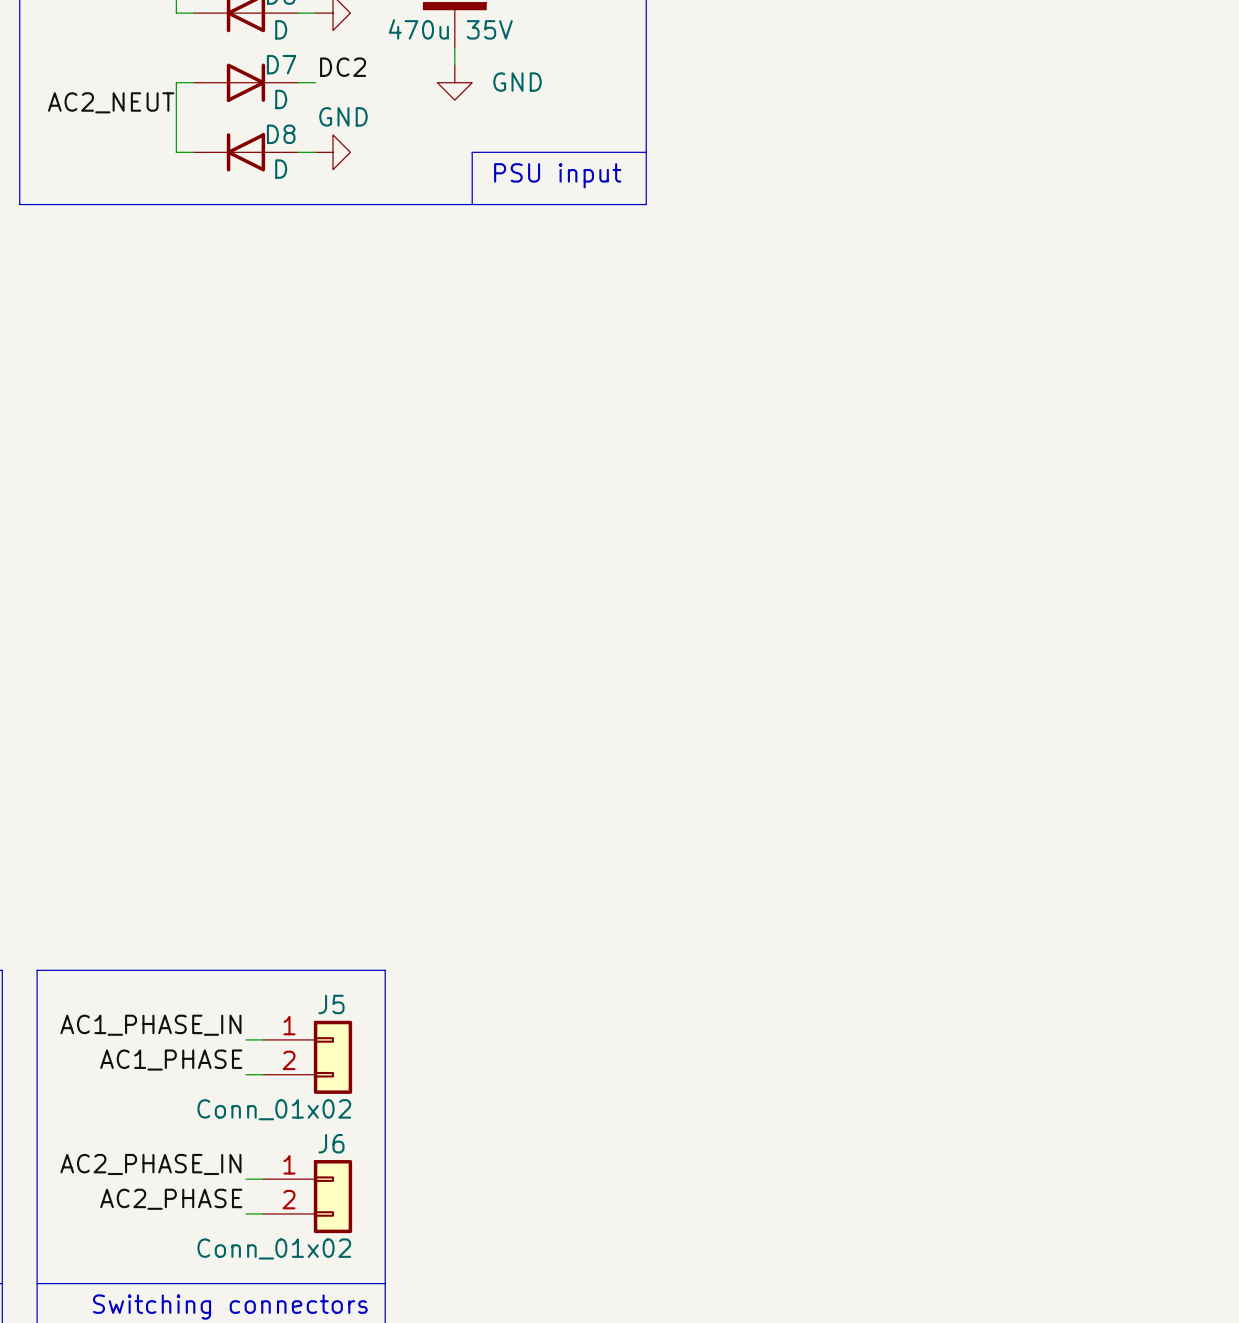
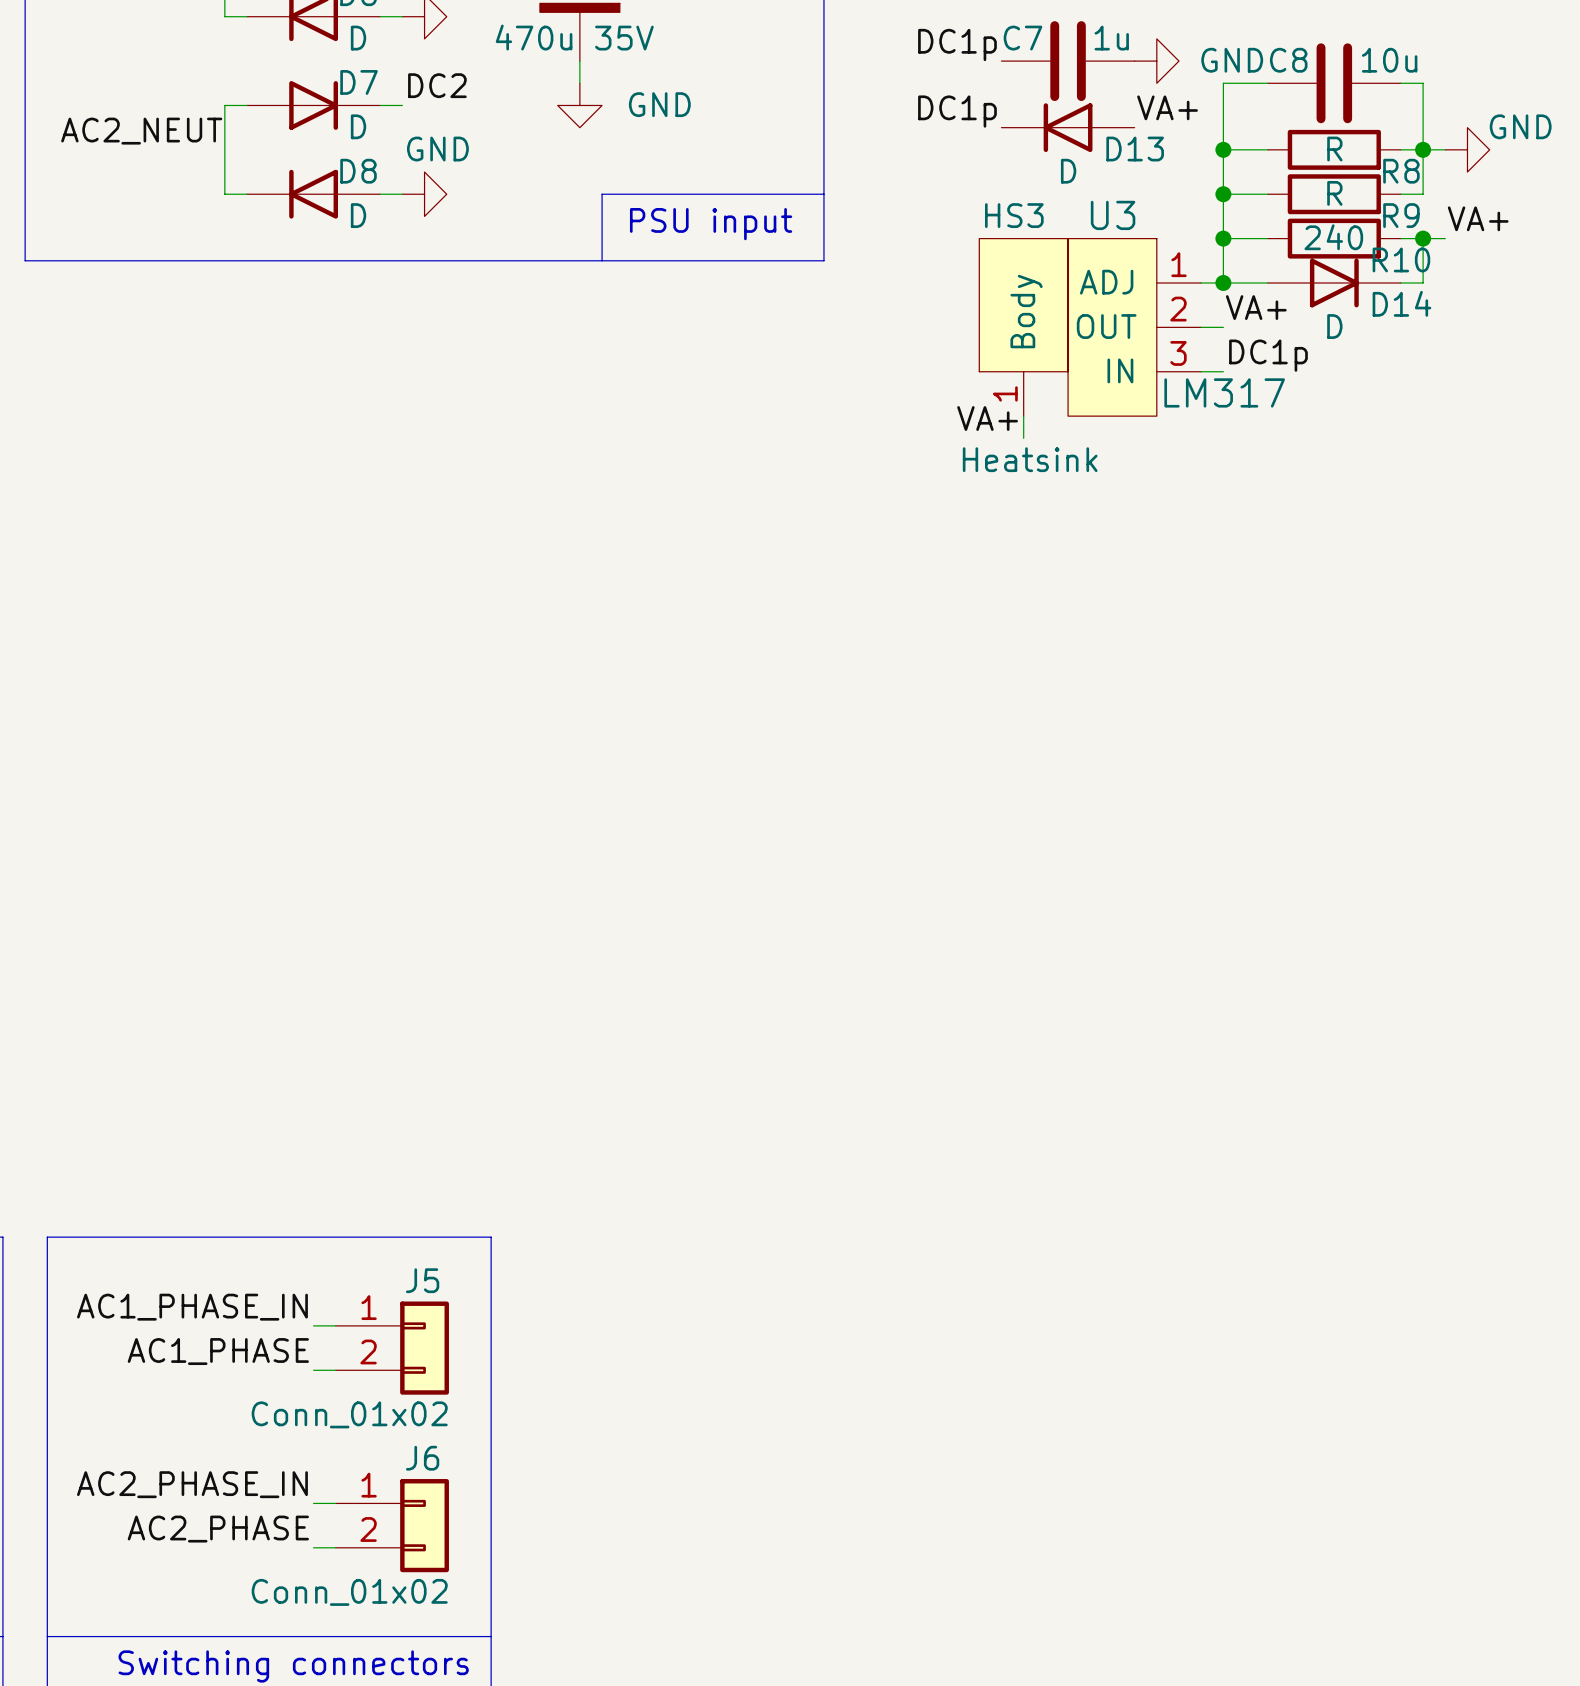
label: none -> DC1p (957, 44)
C7: none -> 1u (1068, 61)
power symbol: none -> GND (1156, 61)
wire: none -> (1267, 83) (1223, 83) (1223, 282)
C8: none -> 10u (1334, 83)
wire: none -> (1400, 83) (1423, 83) (1423, 194) (1400, 194)
label: none -> VA+ (1167, 107)
label: none -> DC1p (957, 111)
D13: none -> D (1068, 127)
wire: none -> (1223, 149) (1267, 149)
junction: none -> (1223, 149)
R8: none -> R (1334, 149)
wire: none -> (1400, 149) (1445, 149)
junction: none -> (1423, 149)
power symbol: none -> GND (1467, 149)
wire: none -> (1223, 194) (1267, 194)
junction: none -> (1223, 194)
R9: none -> R (1334, 194)
label: none -> VA+ (1478, 218)
wire: none -> (1223, 238) (1267, 238)
junction: none -> (1223, 238)
R10: none -> 240 (1334, 238)
wire: none -> (1400, 238) (1445, 238)
wire: none -> (1423, 238) (1423, 282) (1400, 282)
junction: none -> (1423, 238)
wire: none -> (1201, 282) (1267, 282)
junction: none -> (1223, 282)
D14: none -> D (1334, 282)
label: none -> VA+ (1256, 307)
HS3: none -> Heatsink (1023, 327)
U3: none -> LM317 (1134, 327)
wire: none -> (1201, 327) (1223, 327)
label: none -> DC1p (1268, 355)
wire: none -> (1201, 371) (1223, 371)
wire: none -> (1023, 416) (1023, 438)
label: none -> VA+ (987, 418)

